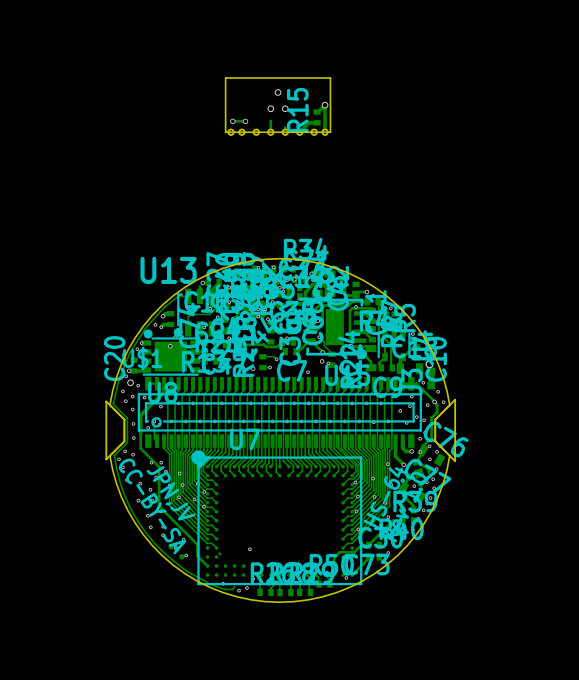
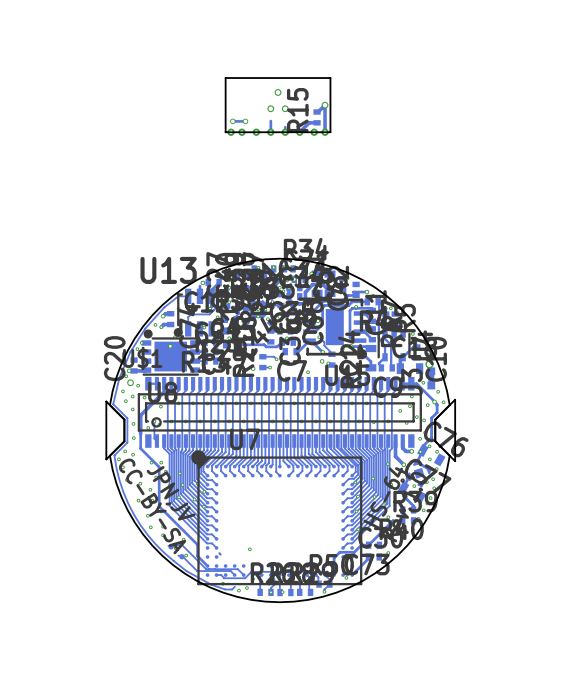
track: none -> (168, 545) (182, 545) (206, 569) (208, 569)
track: none -> (178, 555) (181, 555) (197, 571) (230, 571) (234, 575)
track: none -> (215, 569) (208, 569)
track: none -> (215, 569) (237, 569) (243, 575)
track: none -> (334, 575) (329, 575) (326, 571) (251, 571) (245, 578) (224, 578) (221, 575) (216, 575)
track: none -> (329, 584) (324, 591)
via: none -> (324, 591)
via: none -> (270, 592)
via: none -> (282, 592)

